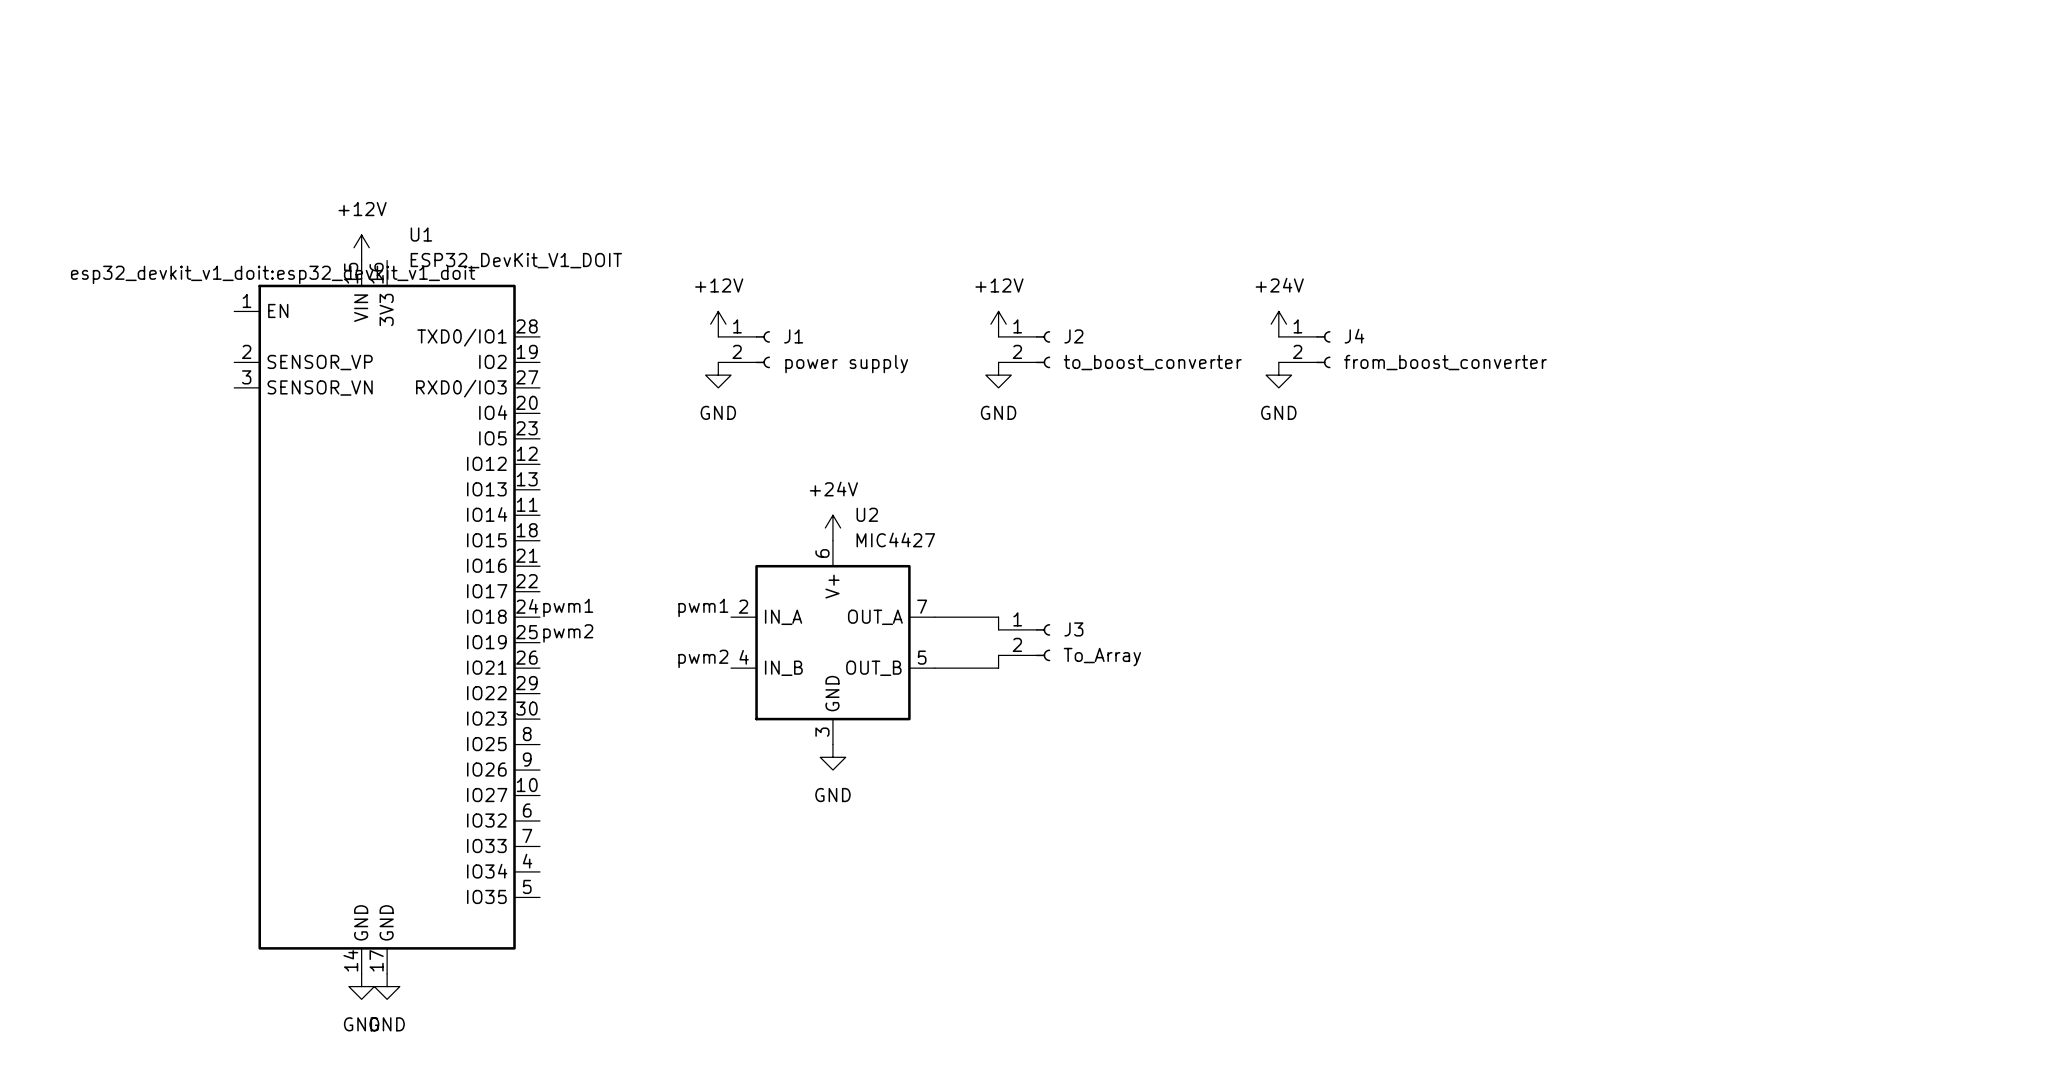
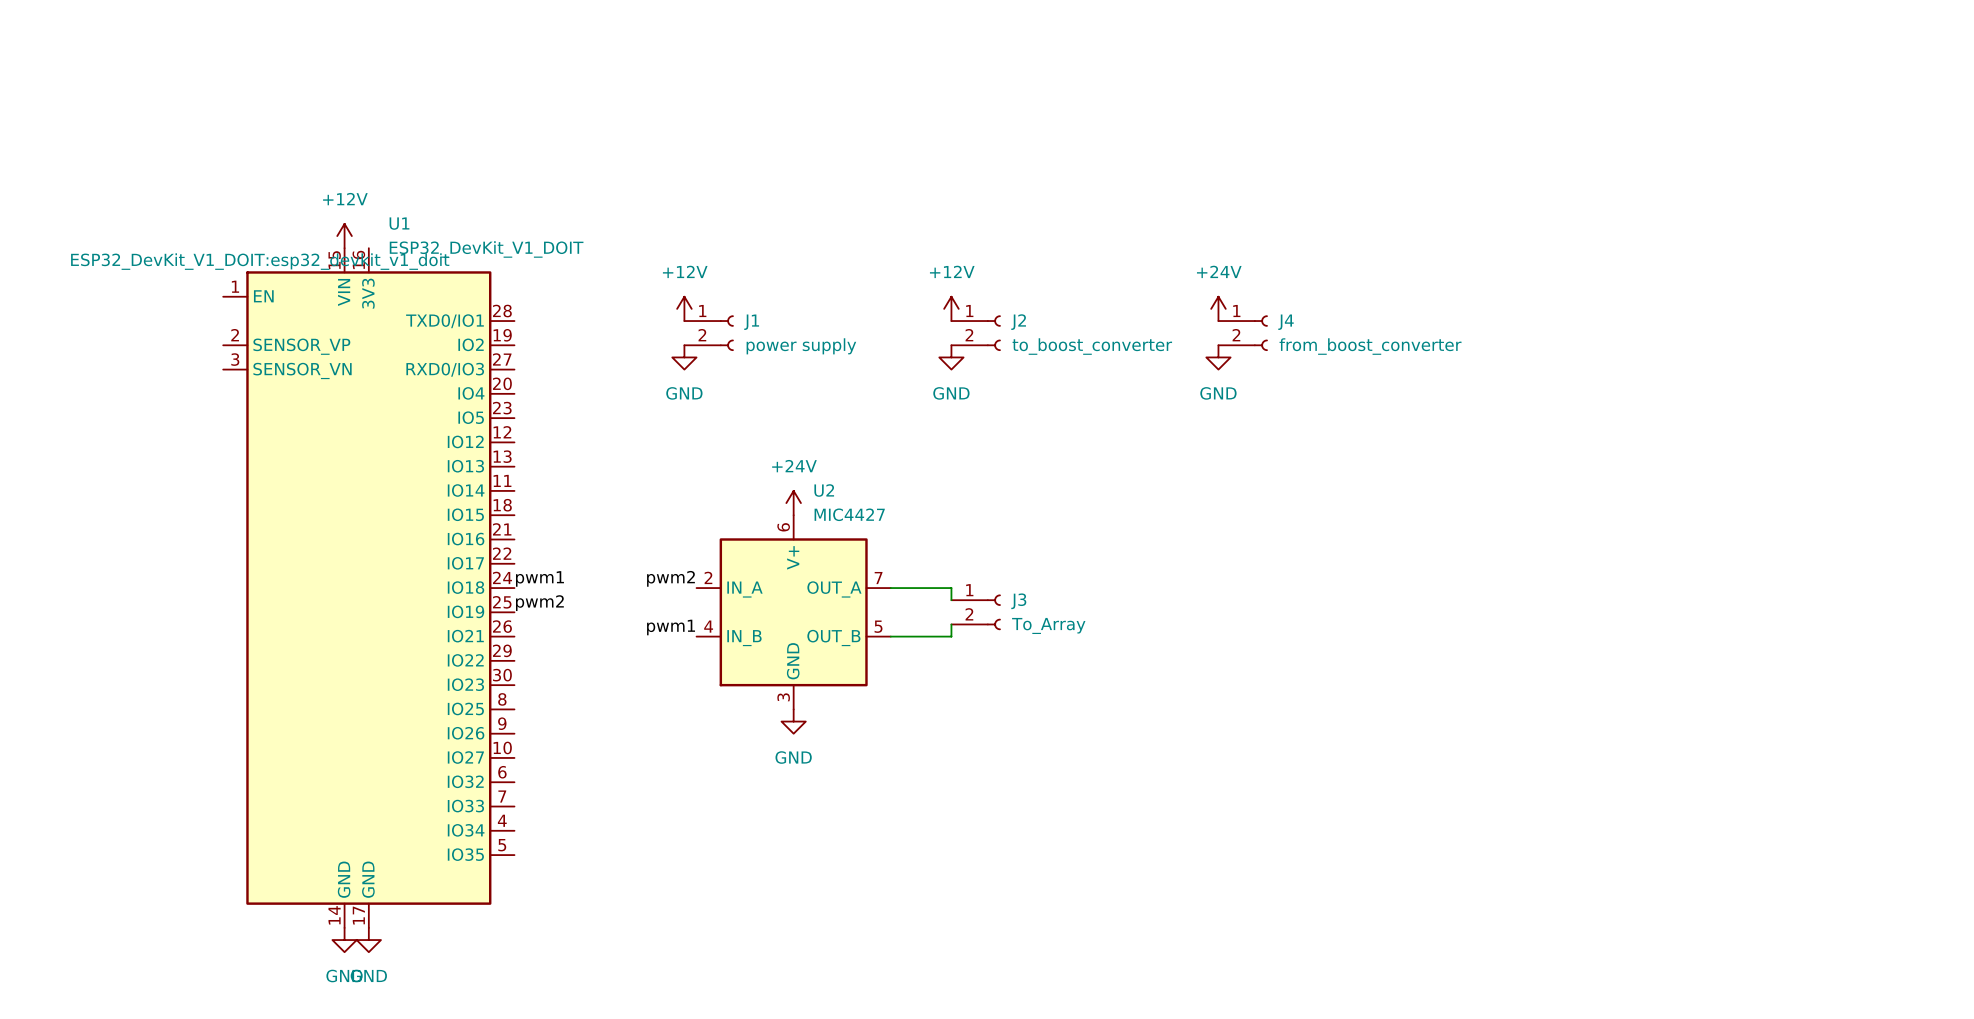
U1 text: esp32_devkit_v1_doit:esp32_devkit_v1_doit (273, 274) -> ESP32_DevKit_V1_DOIT:esp32_devkit_v1_doit (260, 261)
label: pwm1 (703, 607) -> pwm2 (670, 578)
label: pwm2 (703, 658) -> pwm1 (671, 627)

